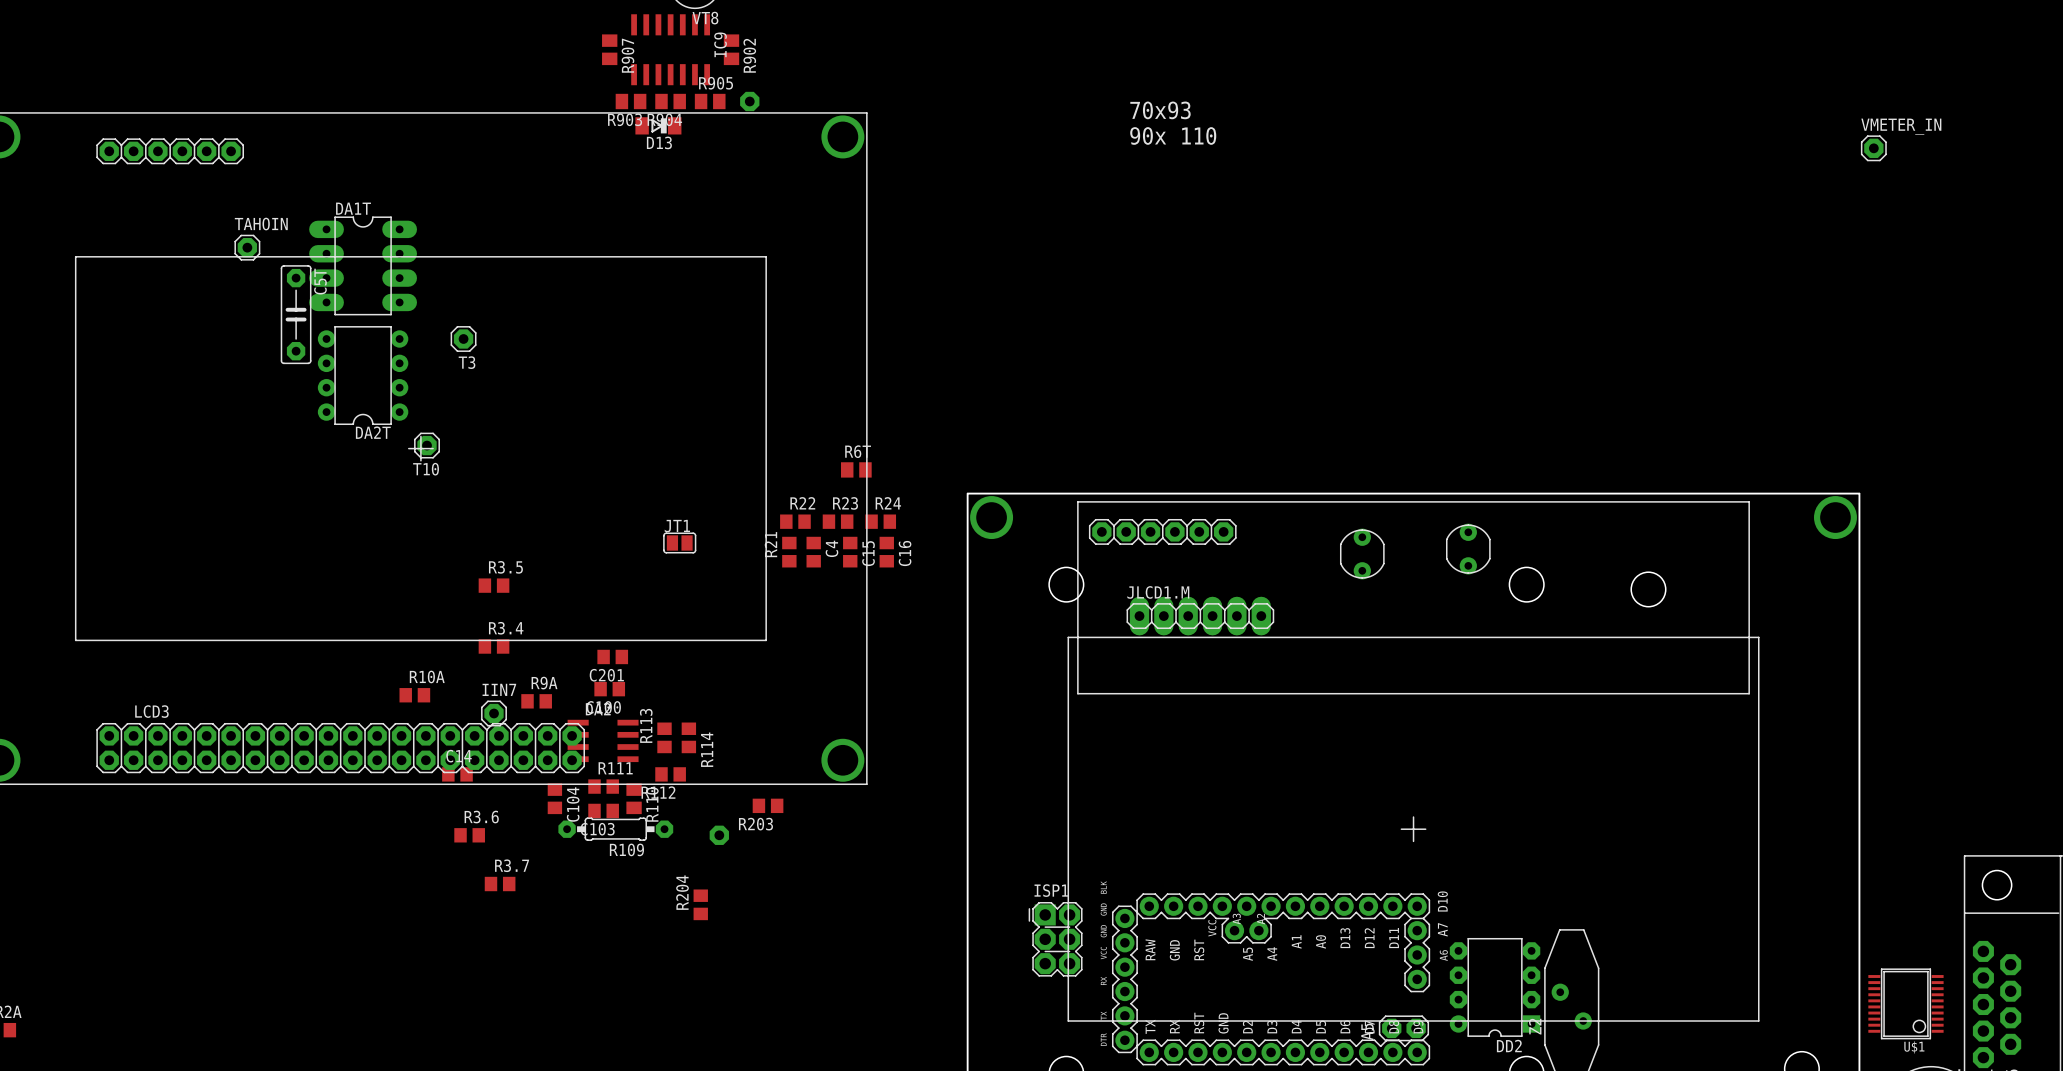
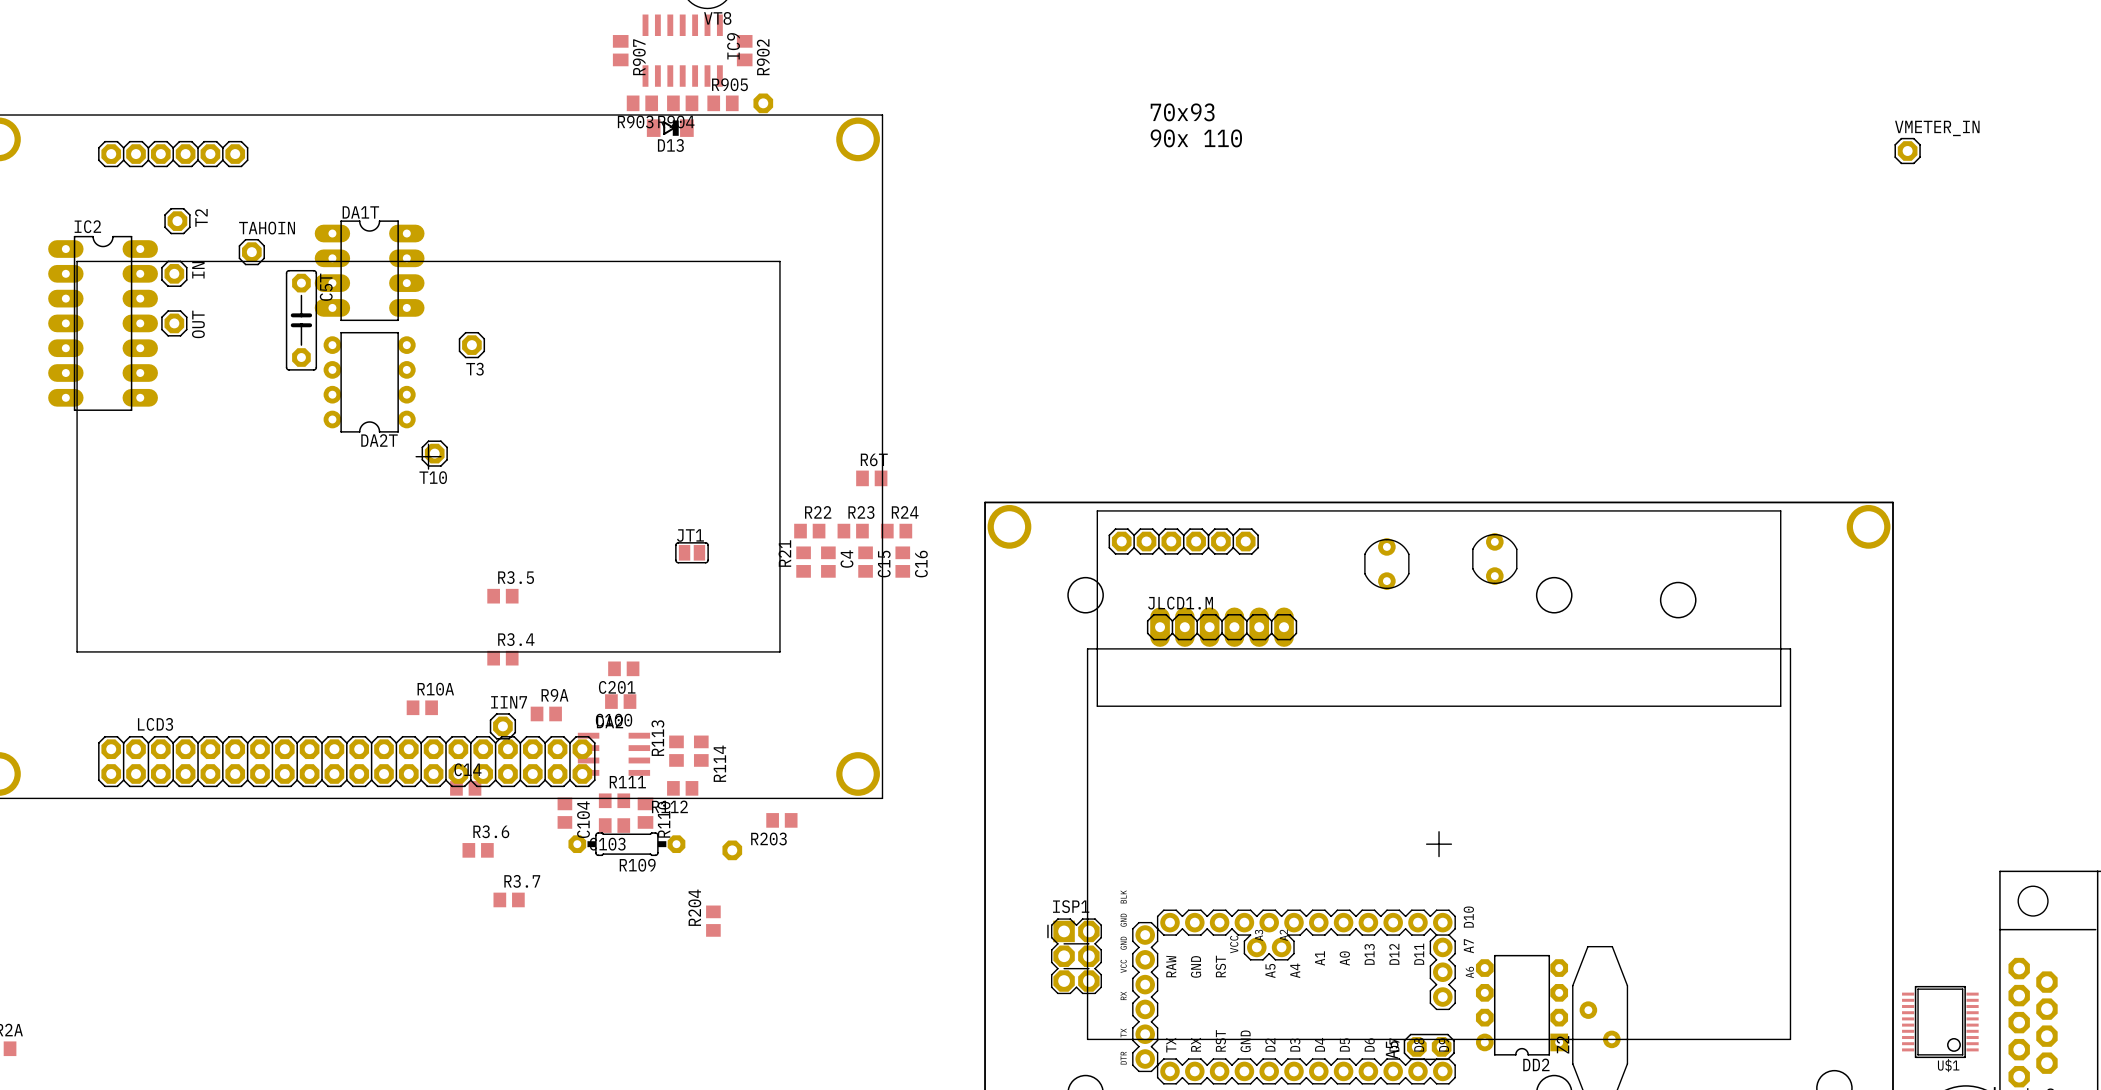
T2: none -> (177, 221)
IN: none -> (174, 273)
IC2: none -> (103, 323)
OUT: none -> (174, 323)

